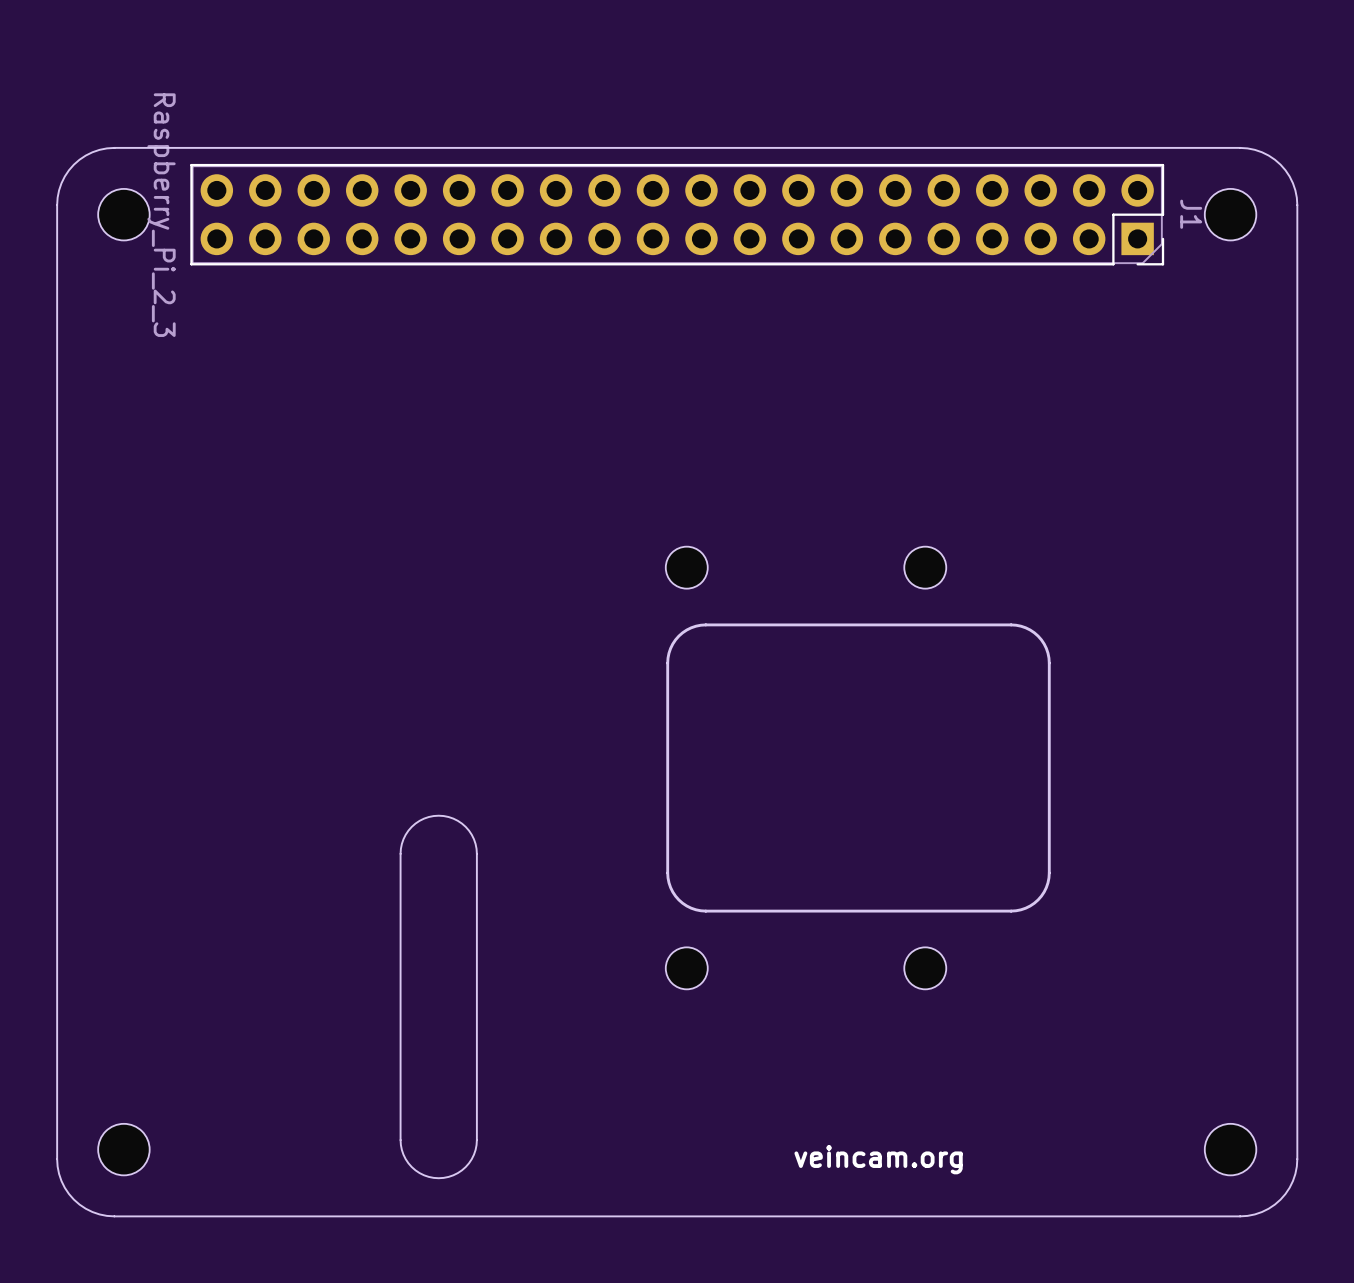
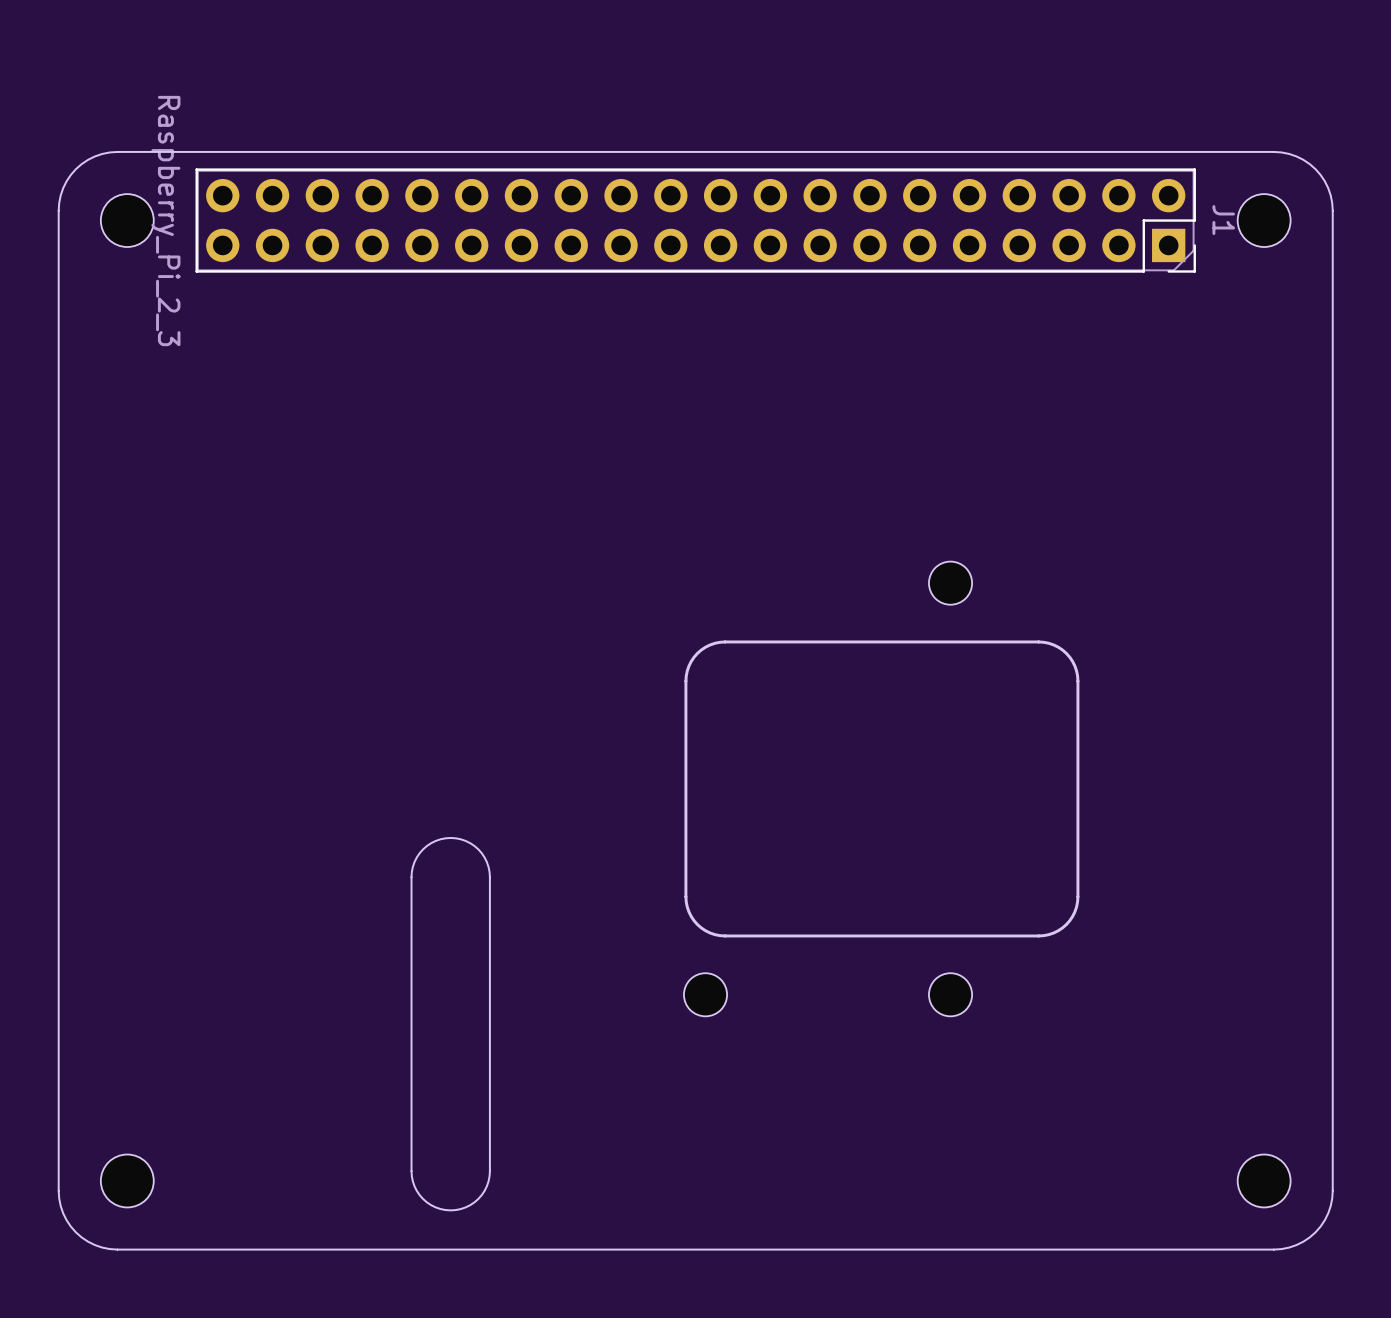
part footprint: [665, 546, 1051, 990] -> [683, 561, 1080, 1017]
text: veincam.org (878, 1159) -> none

